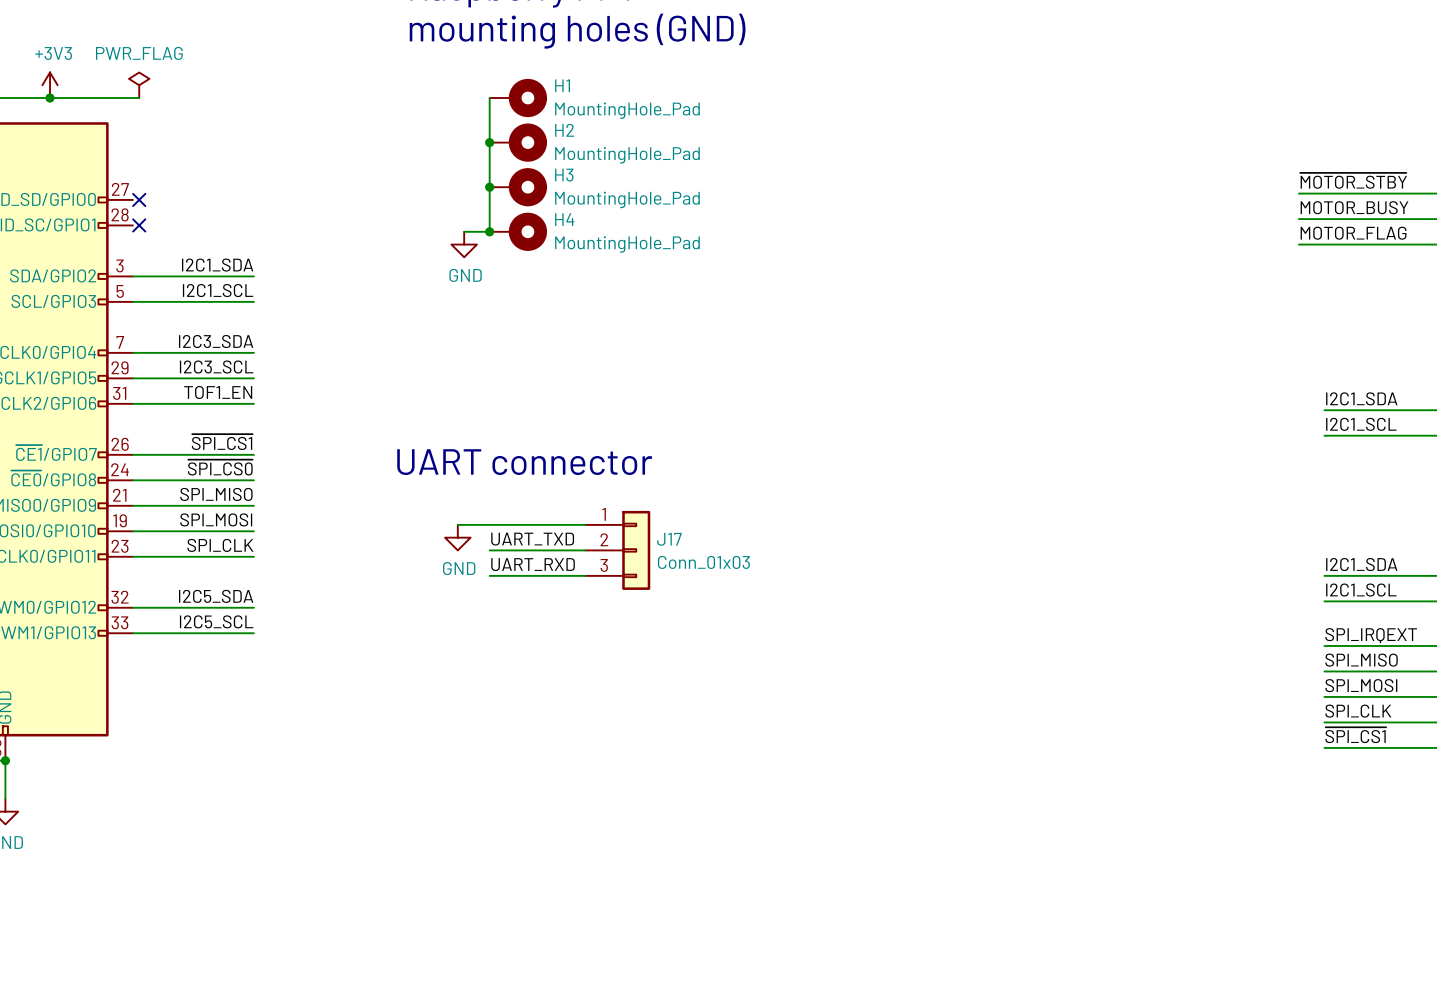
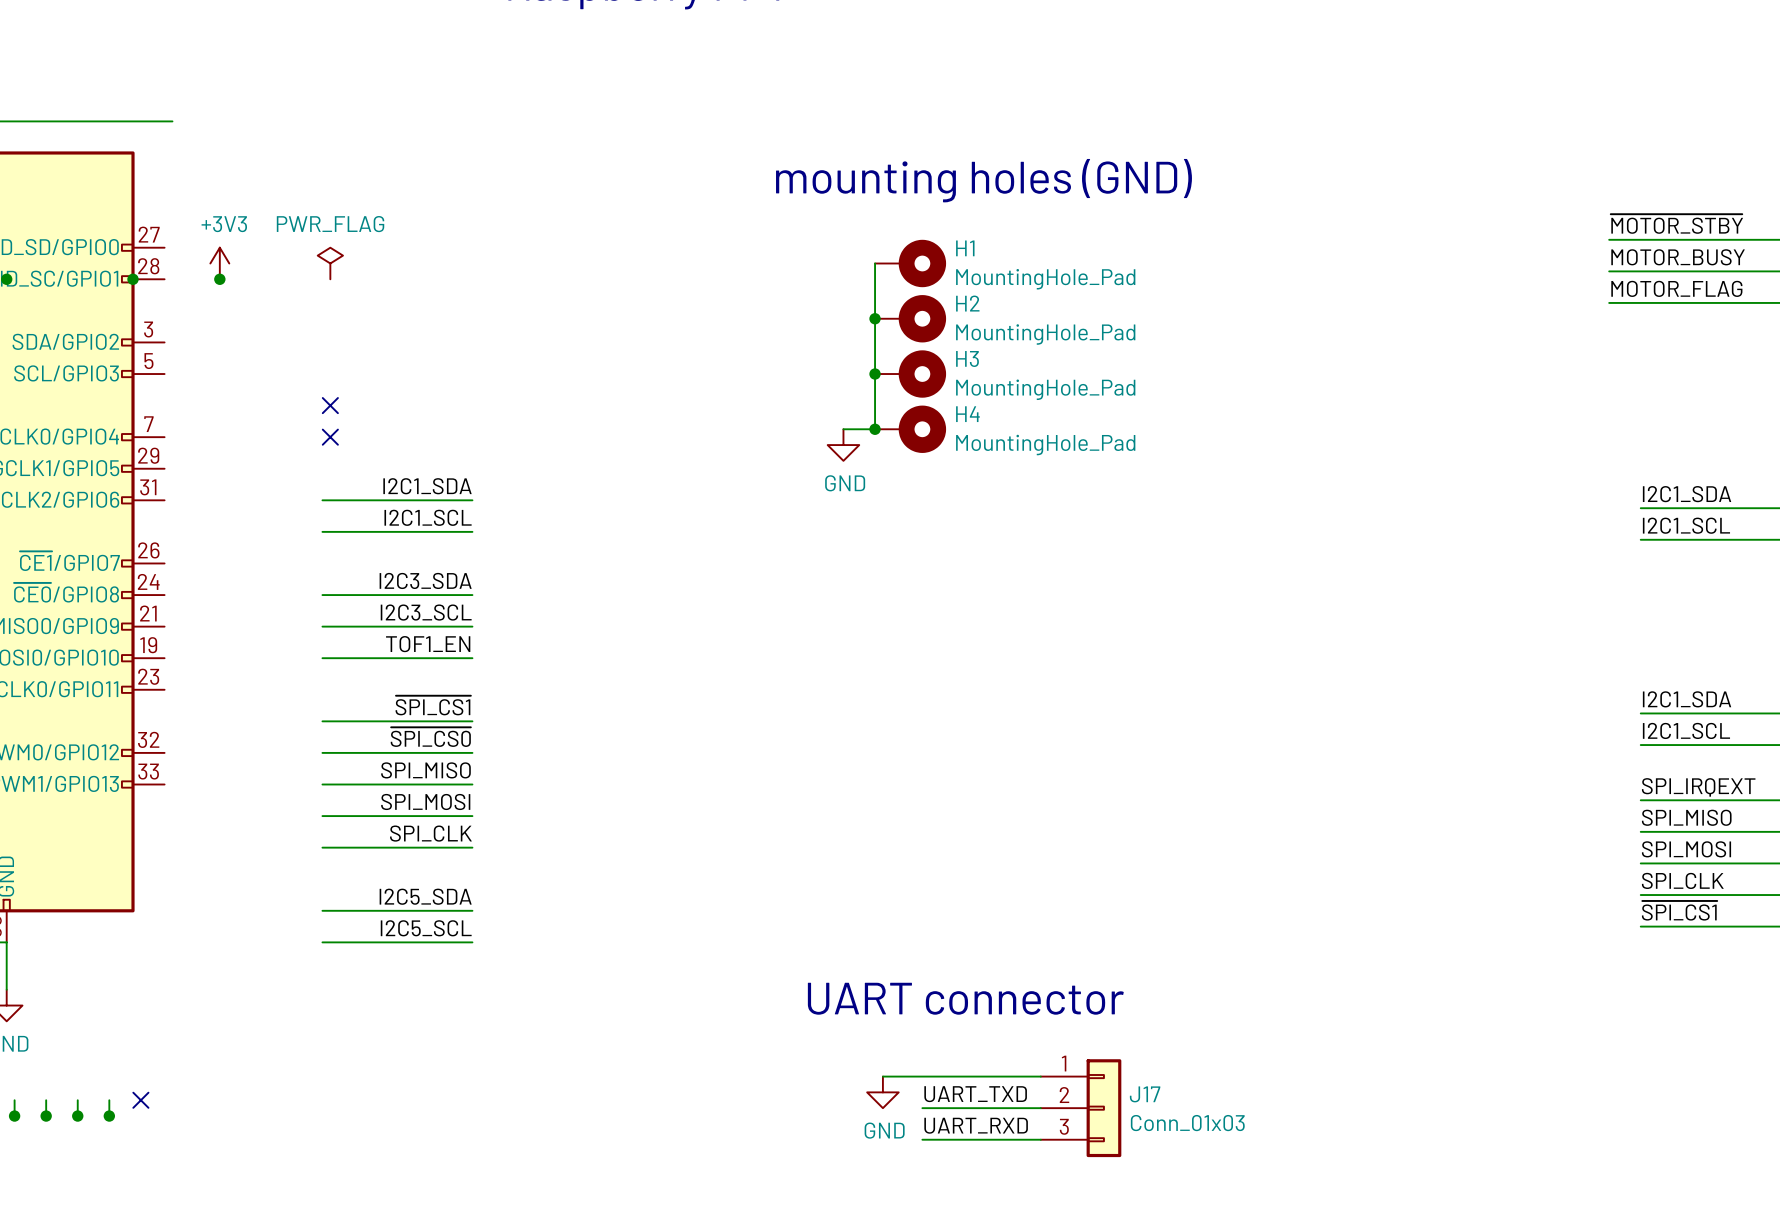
text position: mounting holes (GND) (577, 31) -> mounting holes (GND) (983, 180)
power symbol position: +3V3 (50, 85) -> +3V3 (219, 263)
power symbol position: PWR_FLAG (139, 85) -> PWR_FLAG (330, 263)
junction: (50, 98) -> none
wire: (489, 98) (489, 231) (464, 231) -> (875, 263) (875, 429) (843, 429)
H1 position: (518, 98) -> (910, 263)
junction: (489, 142) -> none
H2 position: (518, 142) -> (910, 318)
junction: (489, 187) -> none
H3 position: (518, 187) -> (910, 374)
no-connect mark: (139, 199) -> none
junction: none -> (6, 279)
junction: none -> (133, 279)
no-connect mark: (139, 225) -> none
junction: none -> (219, 279)
junction: (489, 231) -> none
H4 position: (518, 231) -> (910, 429)
power symbol: GND (464, 244) -> none
junction: none -> (875, 318)
label position: I2C1_SDA (217, 265) -> I2C1_SDA (427, 486)
wire: (132, 276) (253, 276) -> (322, 500) (472, 500)
label position: I2C1_SCL (218, 290) -> I2C1_SCL (428, 517)
wire: (132, 301) (253, 301) -> (322, 531) (472, 531)
junction: none -> (875, 374)
no-connect mark: none -> (330, 405)
label position: I2C3_SDA (216, 341) -> I2C3_SDA (425, 580)
junction: none -> (875, 429)
wire: (132, 352) (253, 352) -> (322, 595) (472, 595)
no-connect mark: none -> (330, 437)
power symbol: none -> GND (843, 445)
label position: I2C3_SCL (216, 367) -> I2C3_SCL (426, 612)
wire: (132, 378) (253, 378) -> (322, 626) (472, 626)
label position: TOF1_EN (218, 392) -> TOF1_EN (428, 644)
wire: (132, 403) (253, 403) -> (322, 658) (472, 658)
label position: ~{SPI_CS1} (222, 442) -> ~{SPI_CS1} (433, 705)
wire: (132, 454) (253, 454) -> (322, 721) (472, 721)
text: UART connector (524, 462) -> none
label position: ~{SPI_CS0} (220, 467) -> ~{SPI_CS0} (430, 737)
wire: (132, 480) (253, 480) -> (322, 752) (472, 752)
label position: SPI_MISO (216, 494) -> SPI_MISO (425, 770)
wire: (132, 505) (253, 505) -> (322, 784) (472, 784)
label position: SPI_MOSI (216, 519) -> SPI_MOSI (425, 801)
wire: (457, 524) (585, 524) -> none
wire: (132, 531) (253, 531) -> (322, 816) (472, 816)
power symbol: GND (457, 537) -> none
label: UART_TXD (532, 539) -> none
label position: SPI_CLK (220, 545) -> SPI_CLK (430, 833)
wire: (489, 550) (585, 550) -> none
J17 position: (617, 550) -> (1081, 1108)
wire: (132, 556) (253, 556) -> (322, 847) (472, 847)
label: UART_RXD (533, 564) -> none
wire: (489, 575) (585, 575) -> none
label position: I2C5_SDA (216, 596) -> I2C5_SDA (425, 896)
wire: (132, 607) (253, 607) -> (322, 910) (472, 910)
label position: I2C5_SCL (216, 621) -> I2C5_SCL (426, 928)
wire: (132, 633) (253, 633) -> (322, 942) (472, 942)
junction: (5, 760) -> none
text: none -> UART connector (965, 998)
wire: none -> (882, 1076) (1040, 1076)
power symbol: none -> GND (882, 1092)
label: none -> UART_TXD (975, 1094)
wire: none -> (14, 1100) (14, 1116)
wire: none -> (46, 1100) (46, 1116)
wire: none -> (77, 1100) (77, 1116)
wire: none -> (109, 1100) (109, 1116)
no-connect mark: none -> (140, 1100)
wire: none -> (922, 1108) (1040, 1108)
junction: none -> (14, 1116)
junction: none -> (46, 1116)
junction: none -> (77, 1116)
junction: none -> (109, 1116)
label: none -> UART_RXD (976, 1125)
wire: none -> (922, 1139) (1040, 1139)

